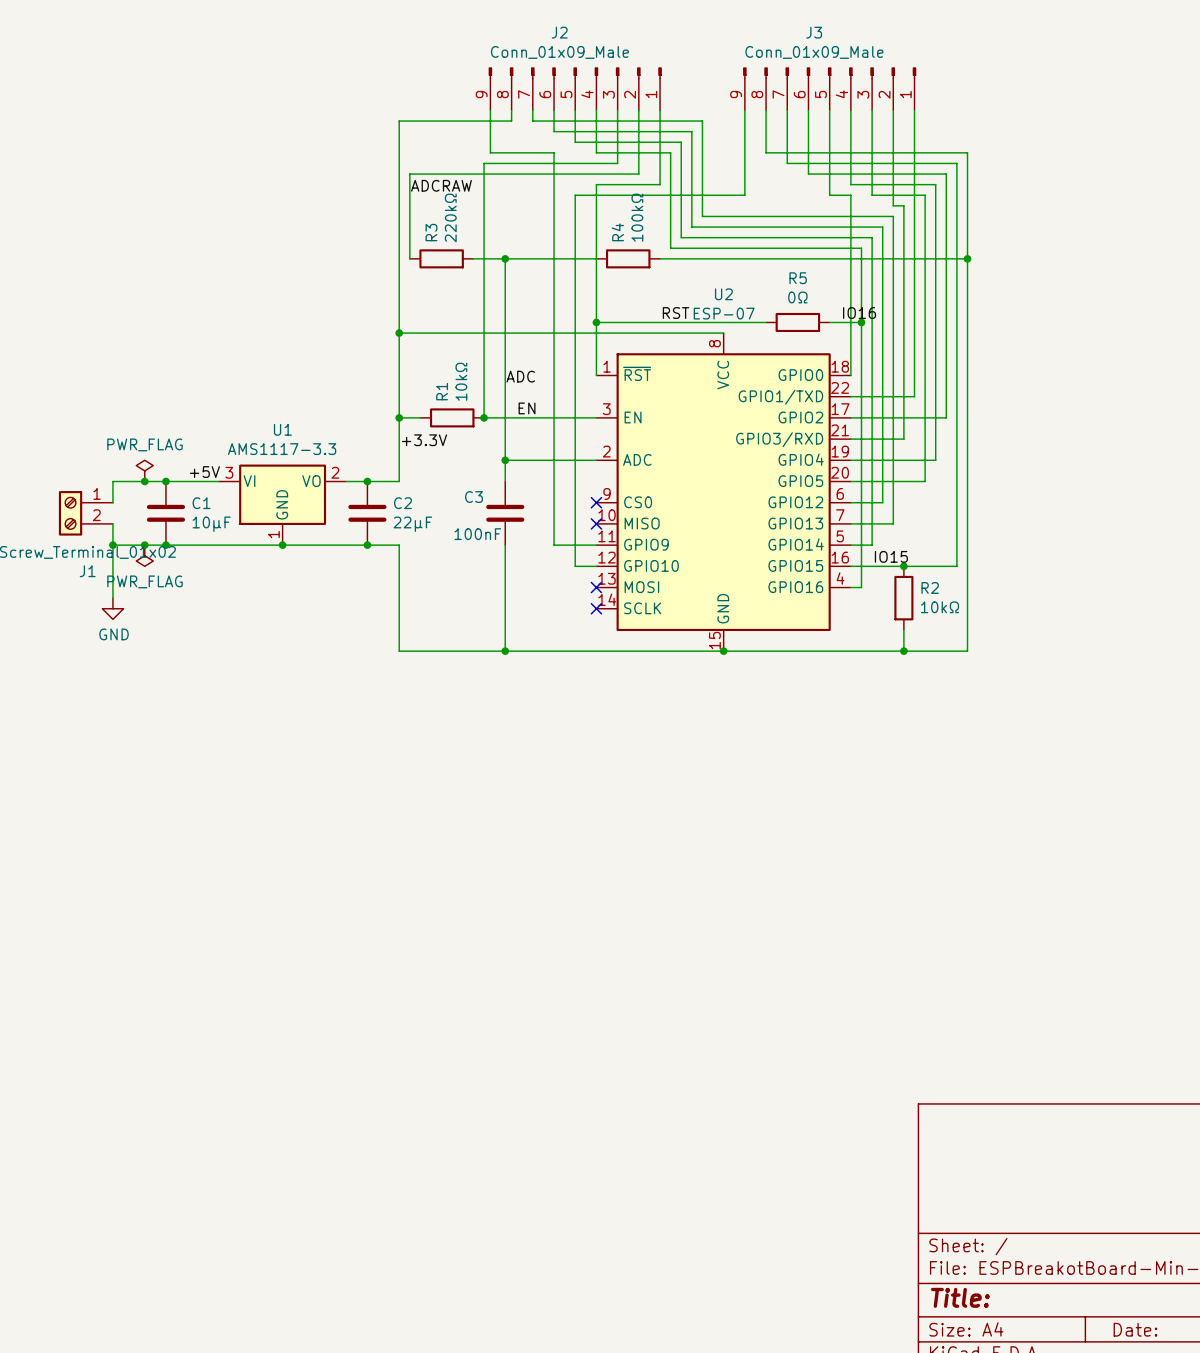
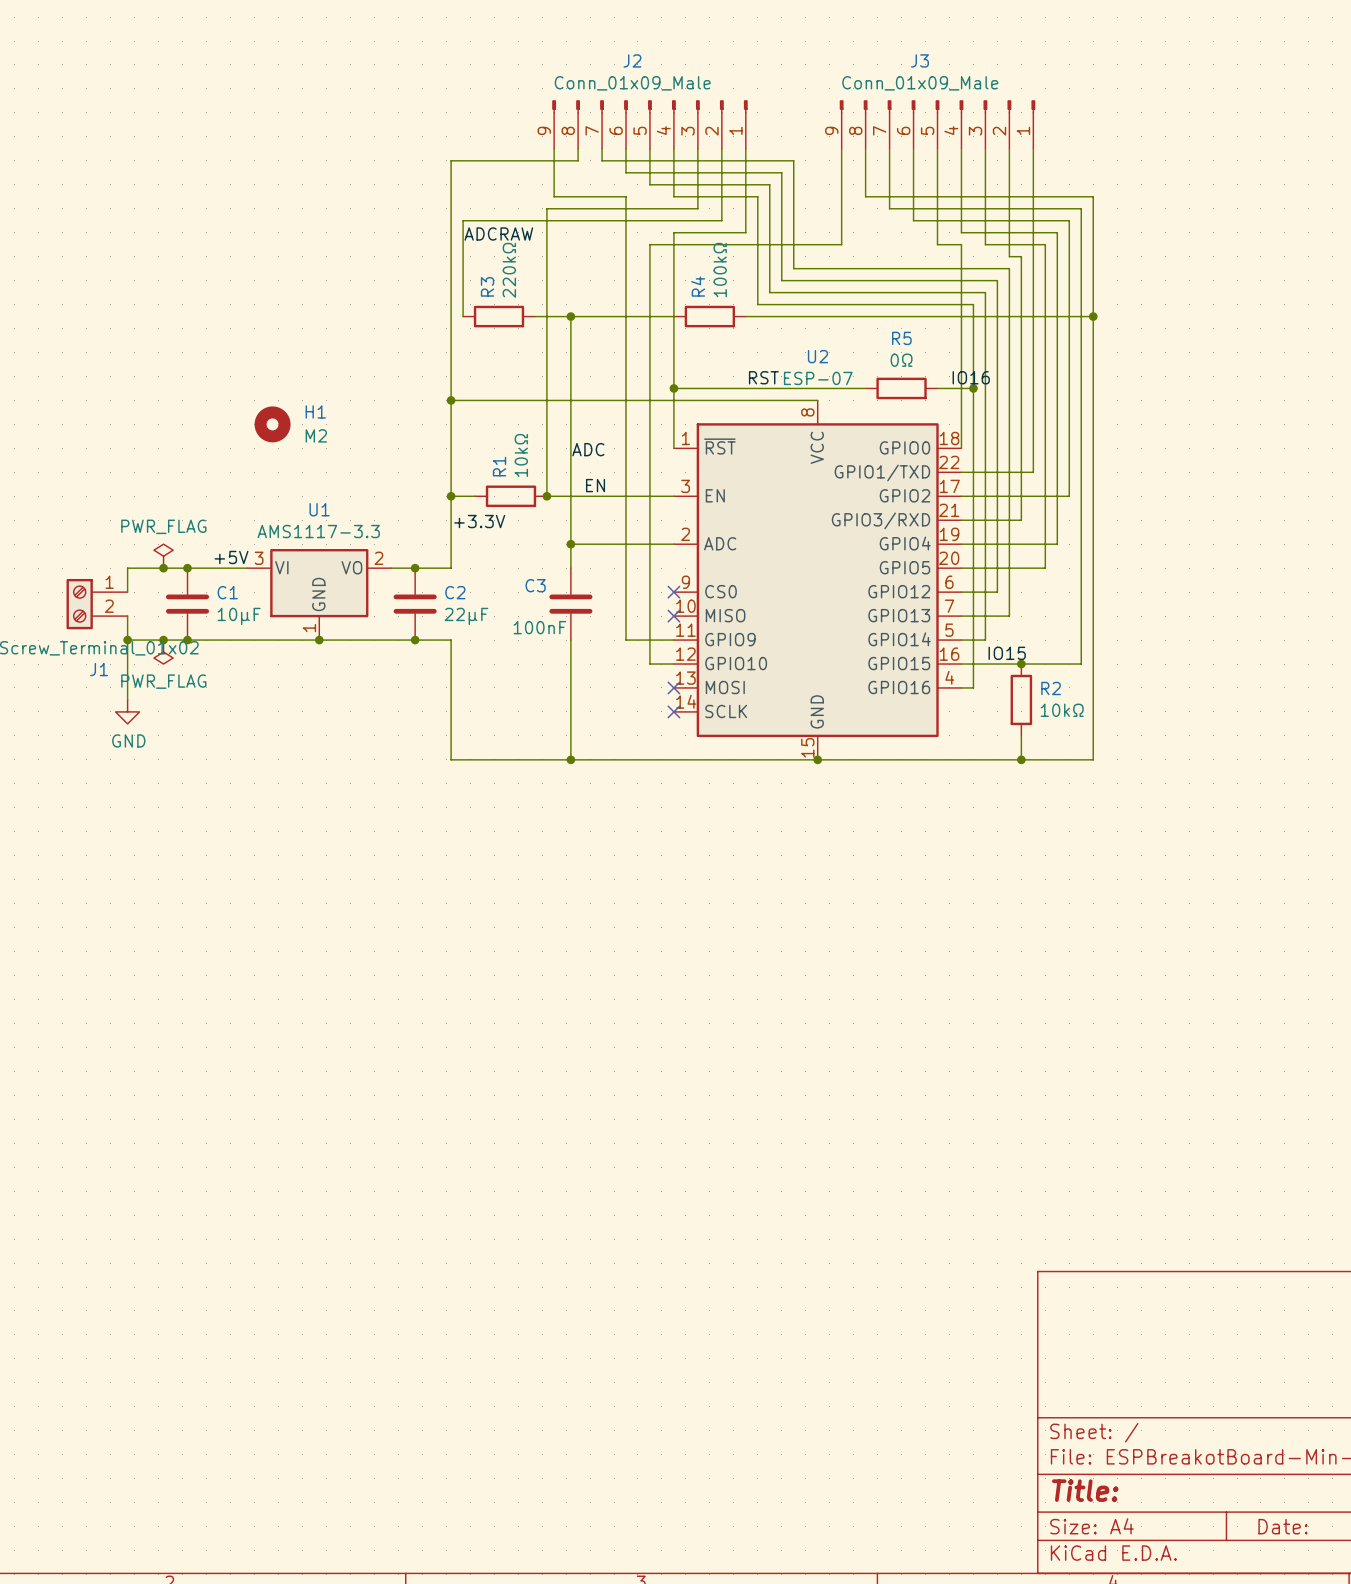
H1: none -> M2 (272, 424)

